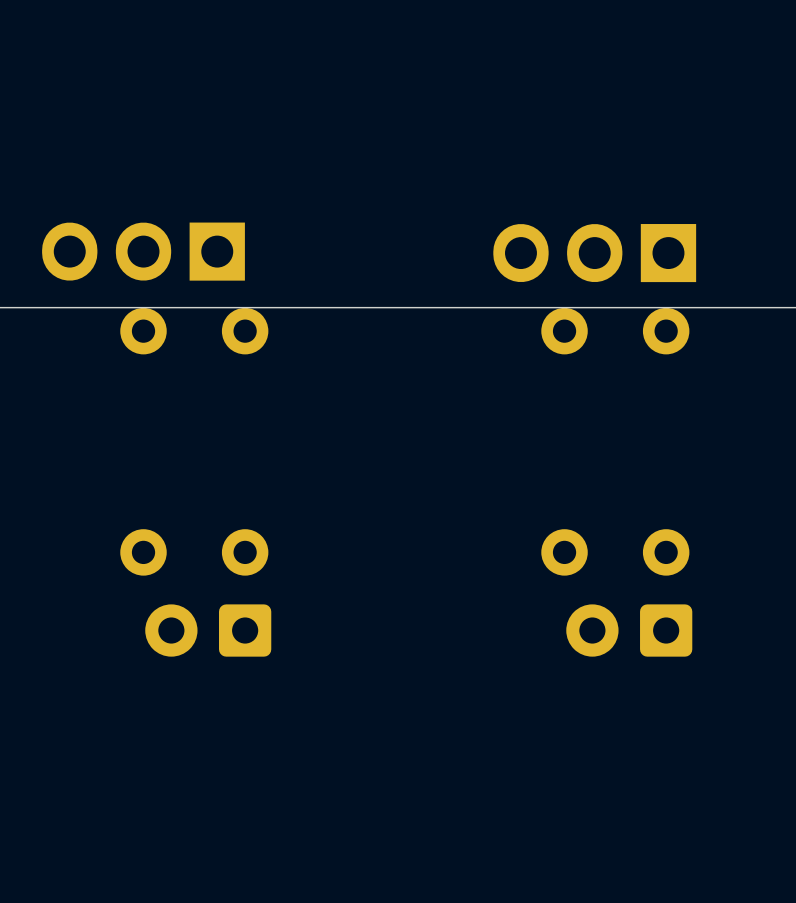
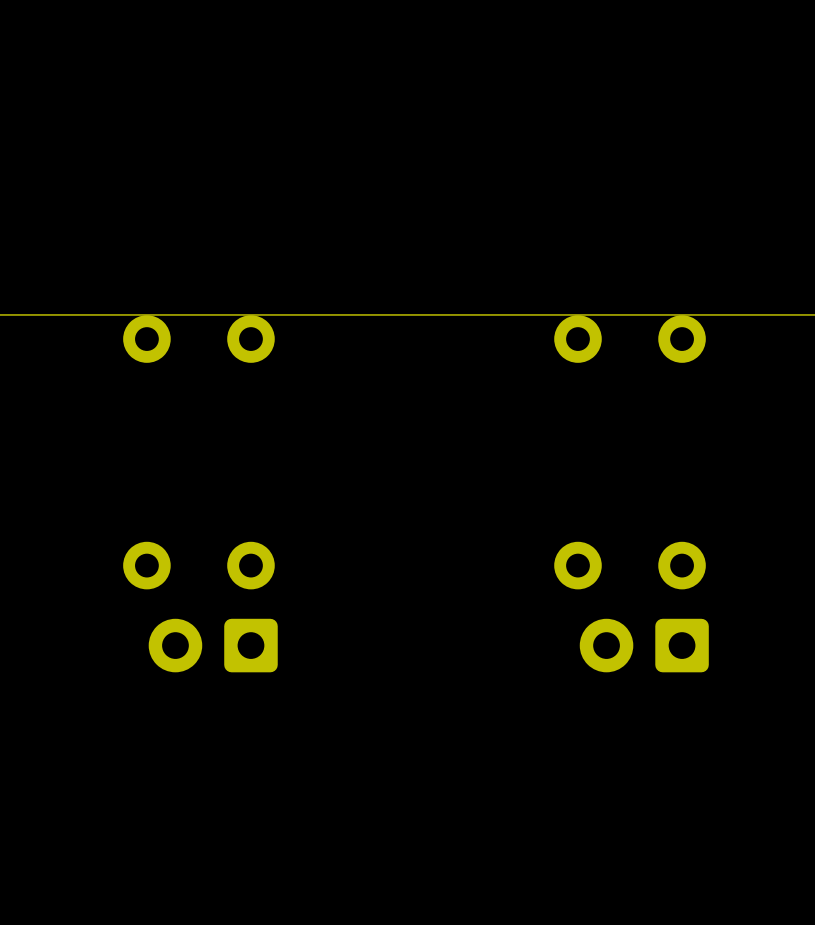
part: (143, 251) -> none
part: (594, 253) -> none

